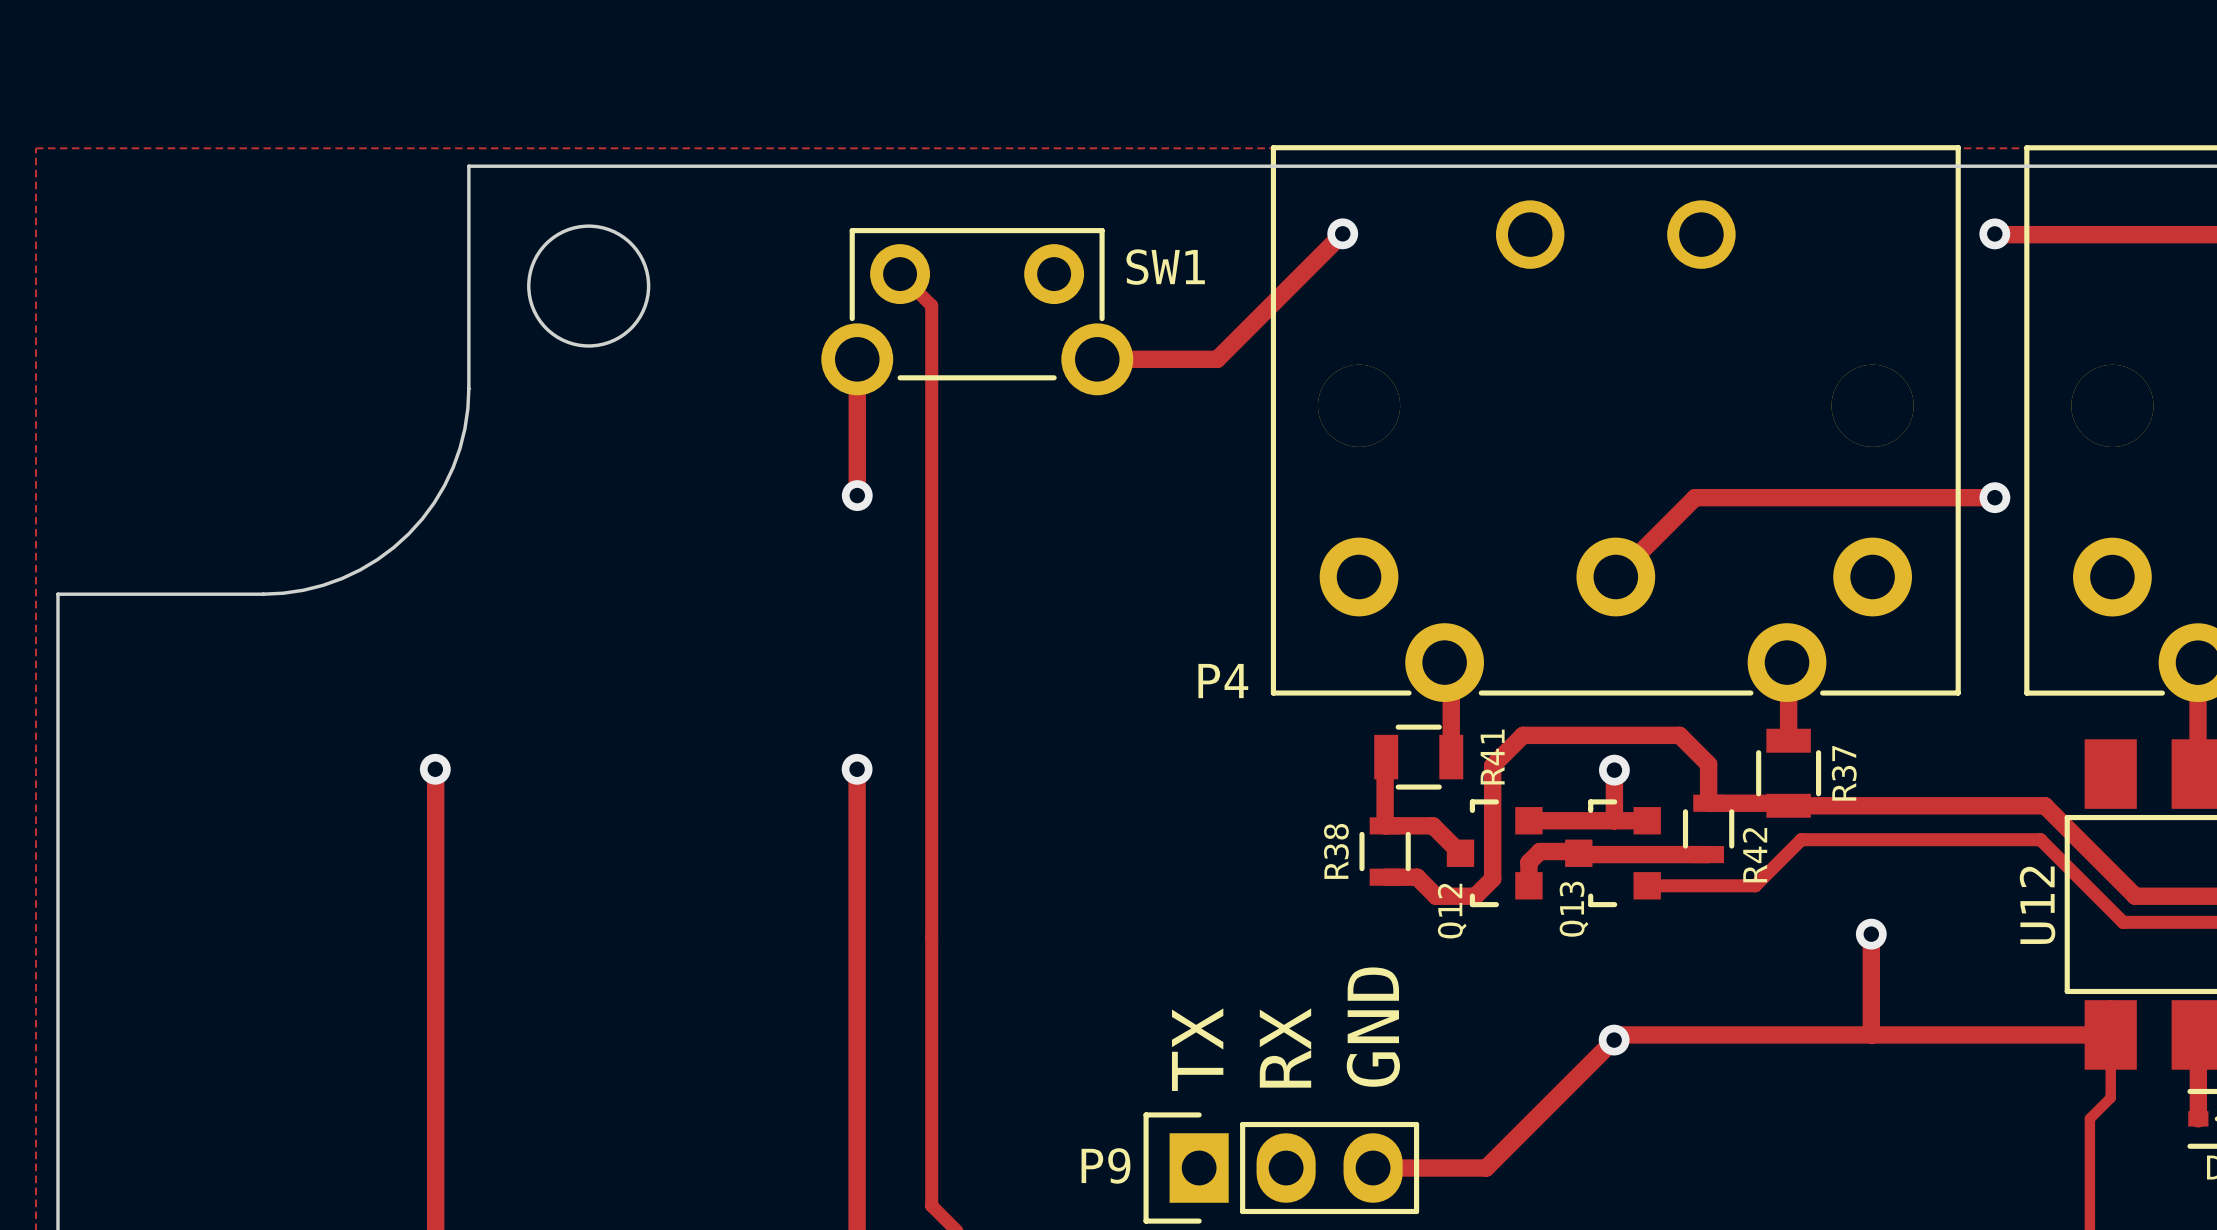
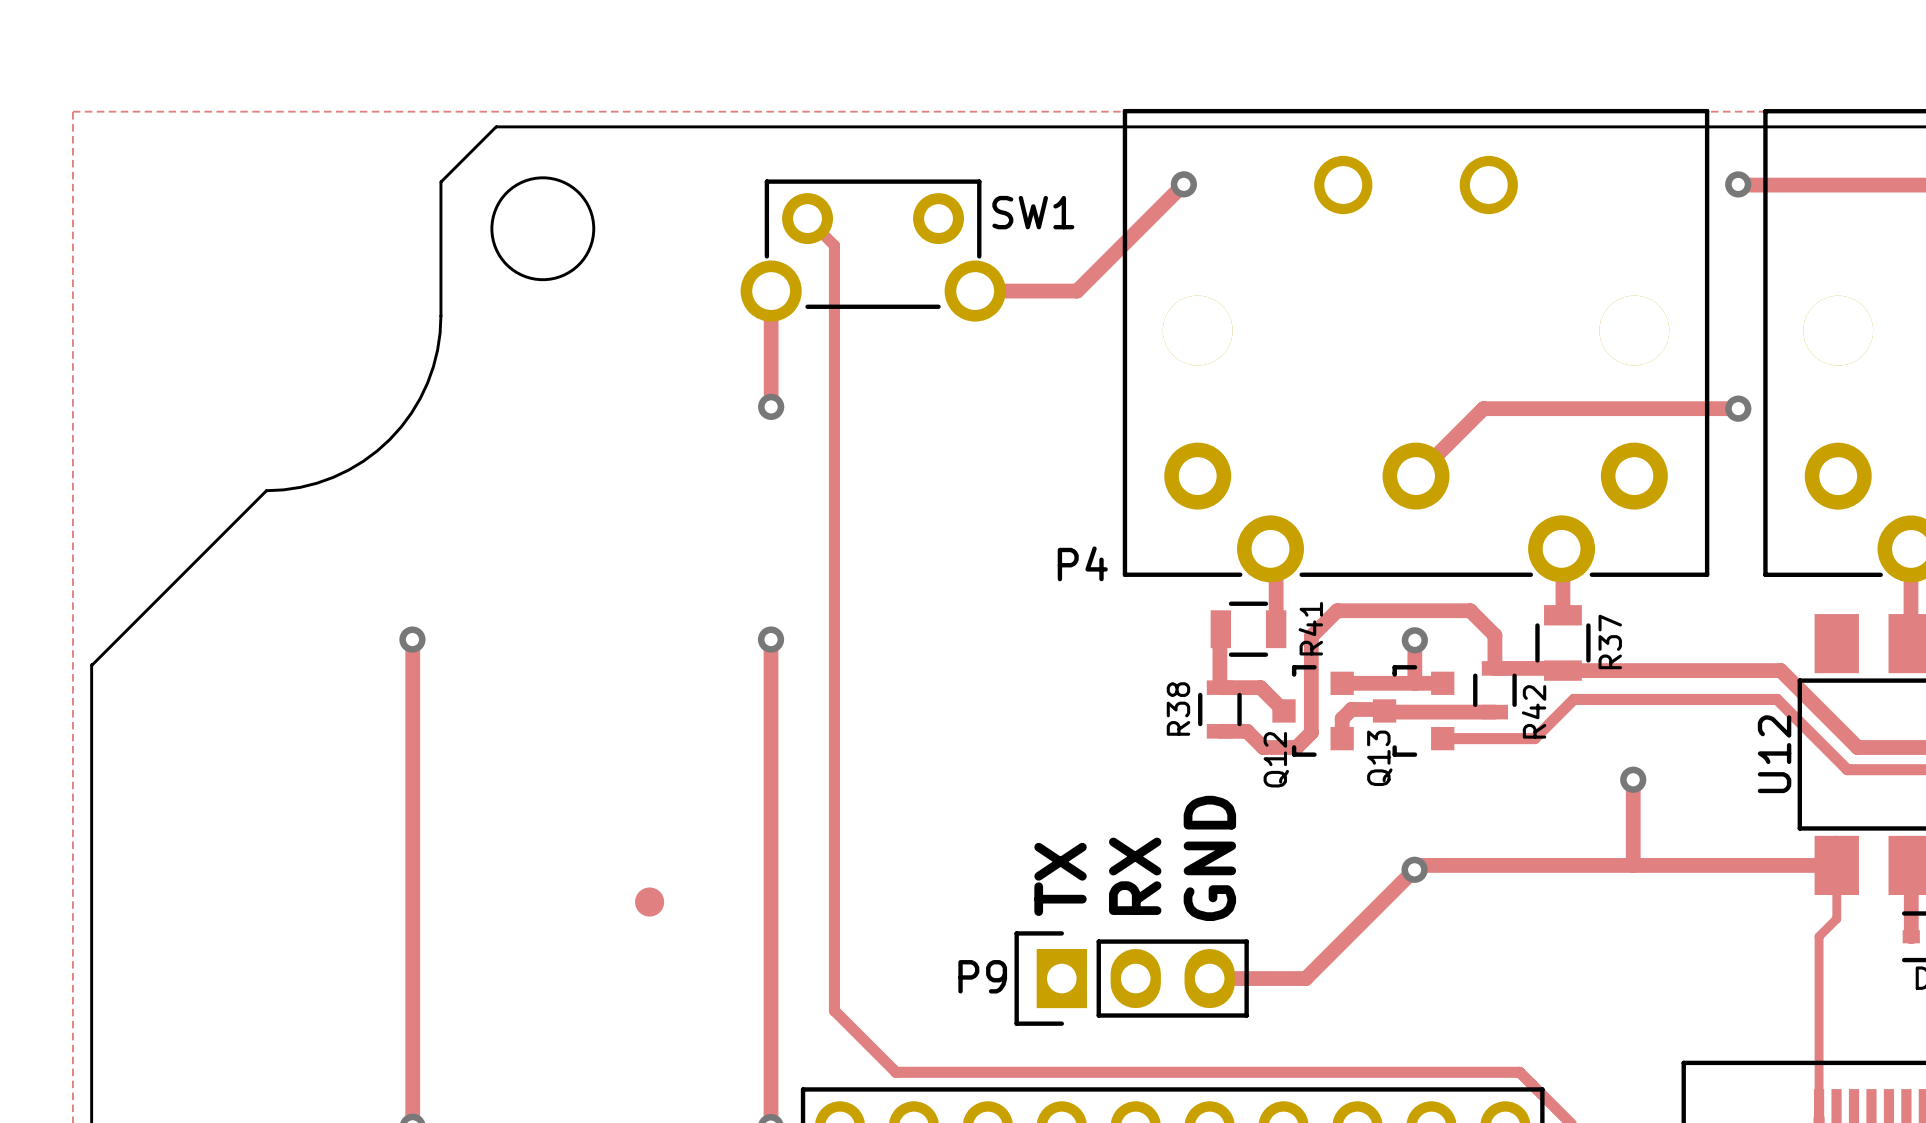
board edge: (534, 166) (468, 166) (468, 230) -> (496, 126) (441, 181)
board edge: (263, 594) (57, 594) (57, 798) -> (266, 490) (92, 665)
part: none -> (649, 902)

